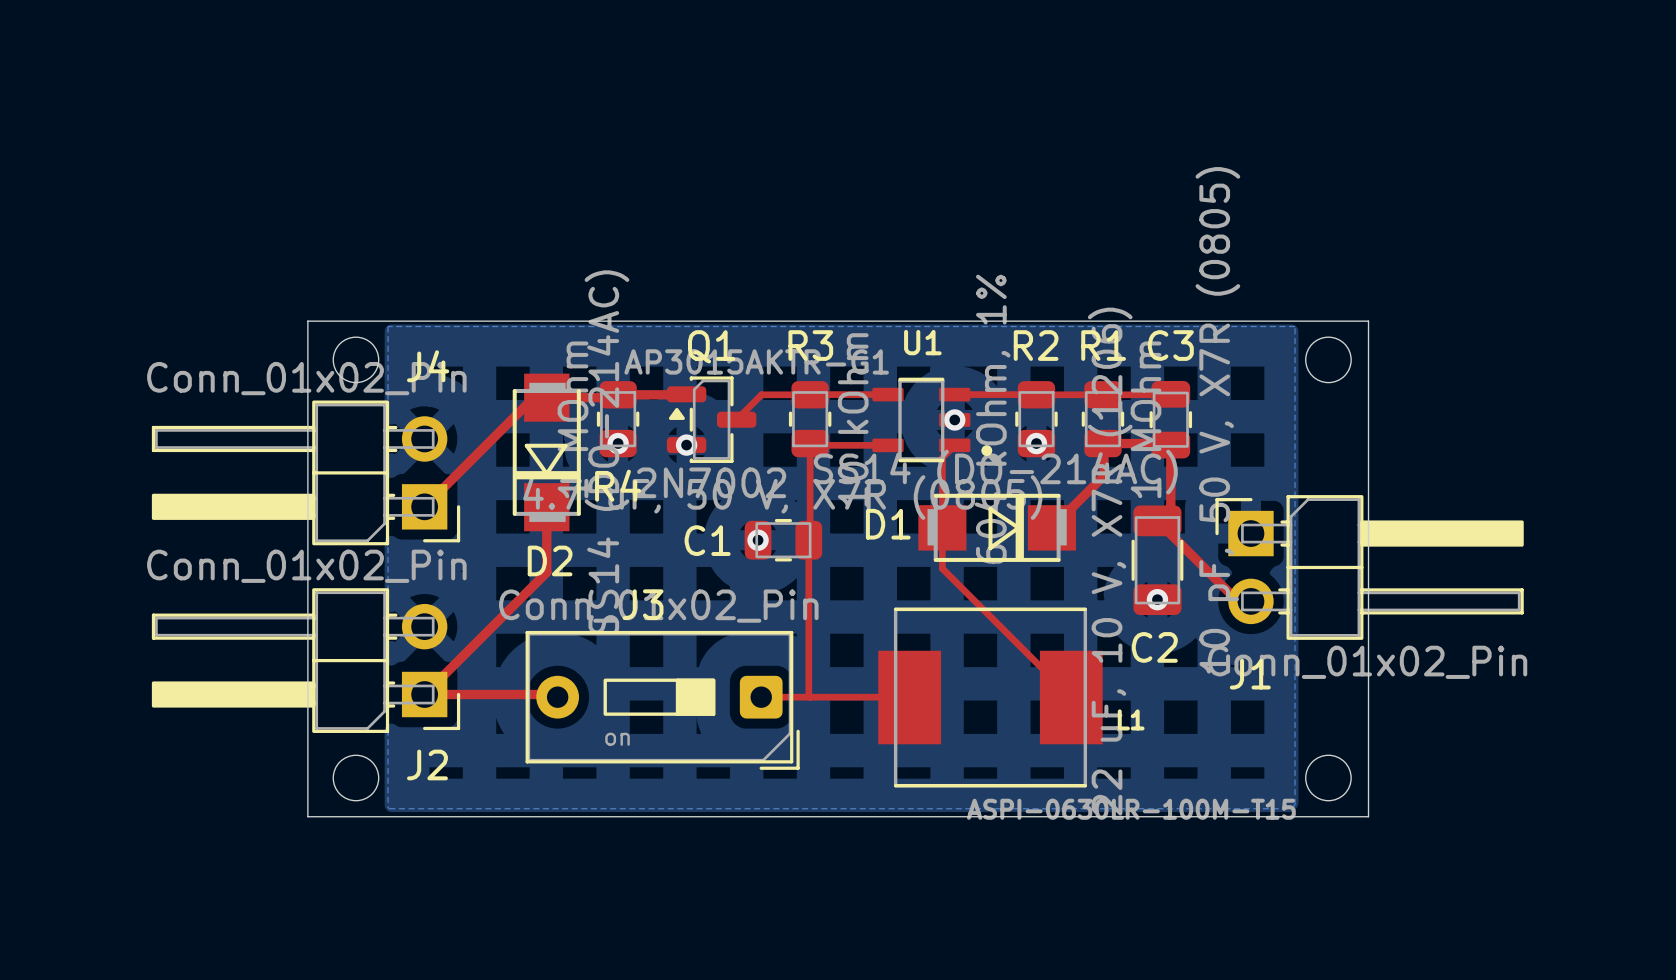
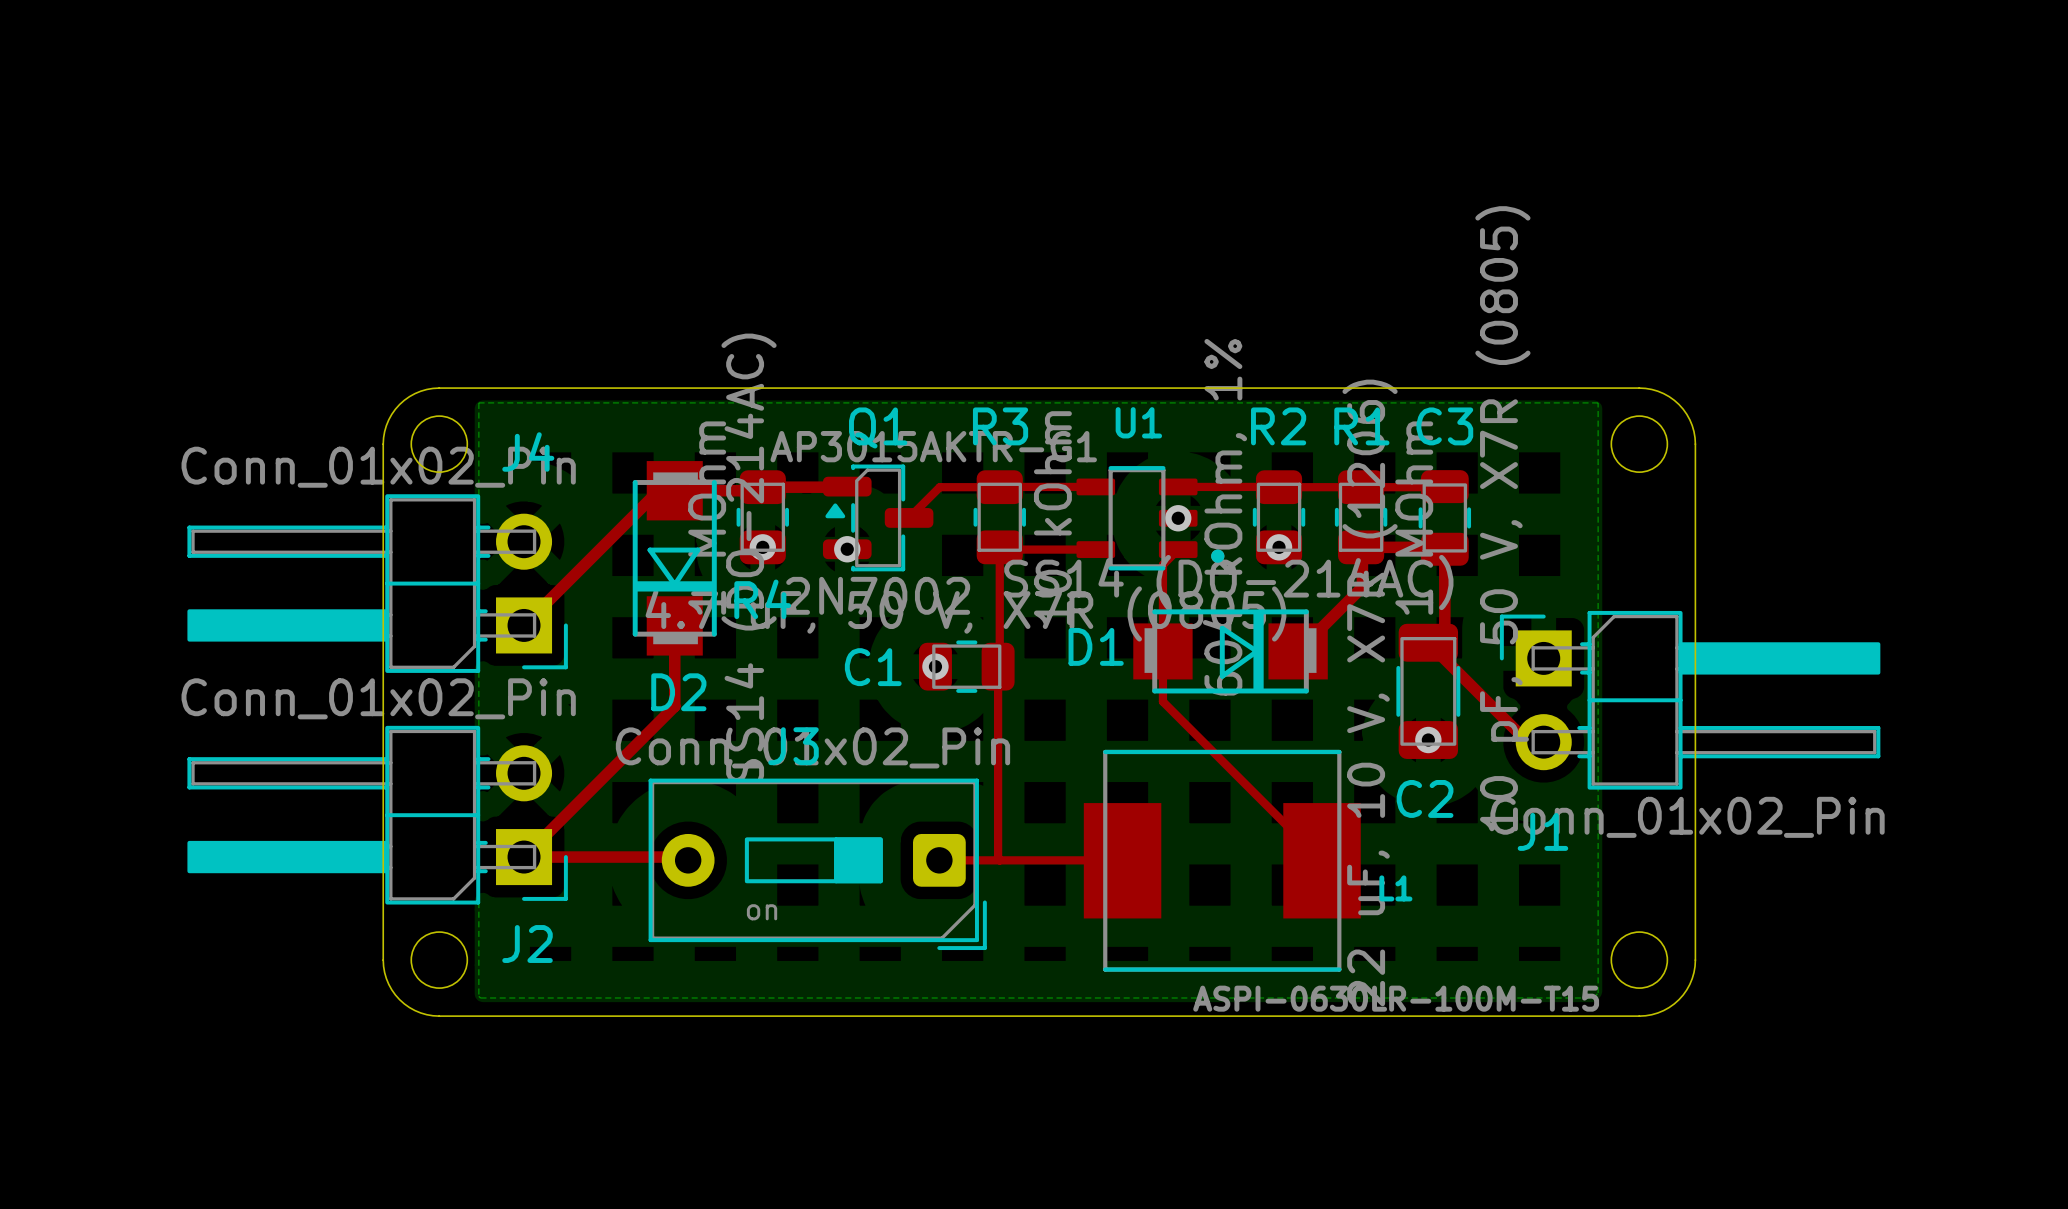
board edge: (307, 321) (1368, 321) (1368, 816) (307, 816) (307, 321) -> (439, 388) (414, 393) (399, 404) (386, 425) (383, 444) (383, 960) (386, 978) (391, 989) (399, 999) (414, 1010) (439, 1016) (1639, 1016) (1657, 1012) (1669, 1007) (1683, 995) (1689, 984) (1695, 960) (1695, 444) (1692, 425) (1686, 414) (1674, 400) (1663, 393) (1639, 388) (439, 388)

